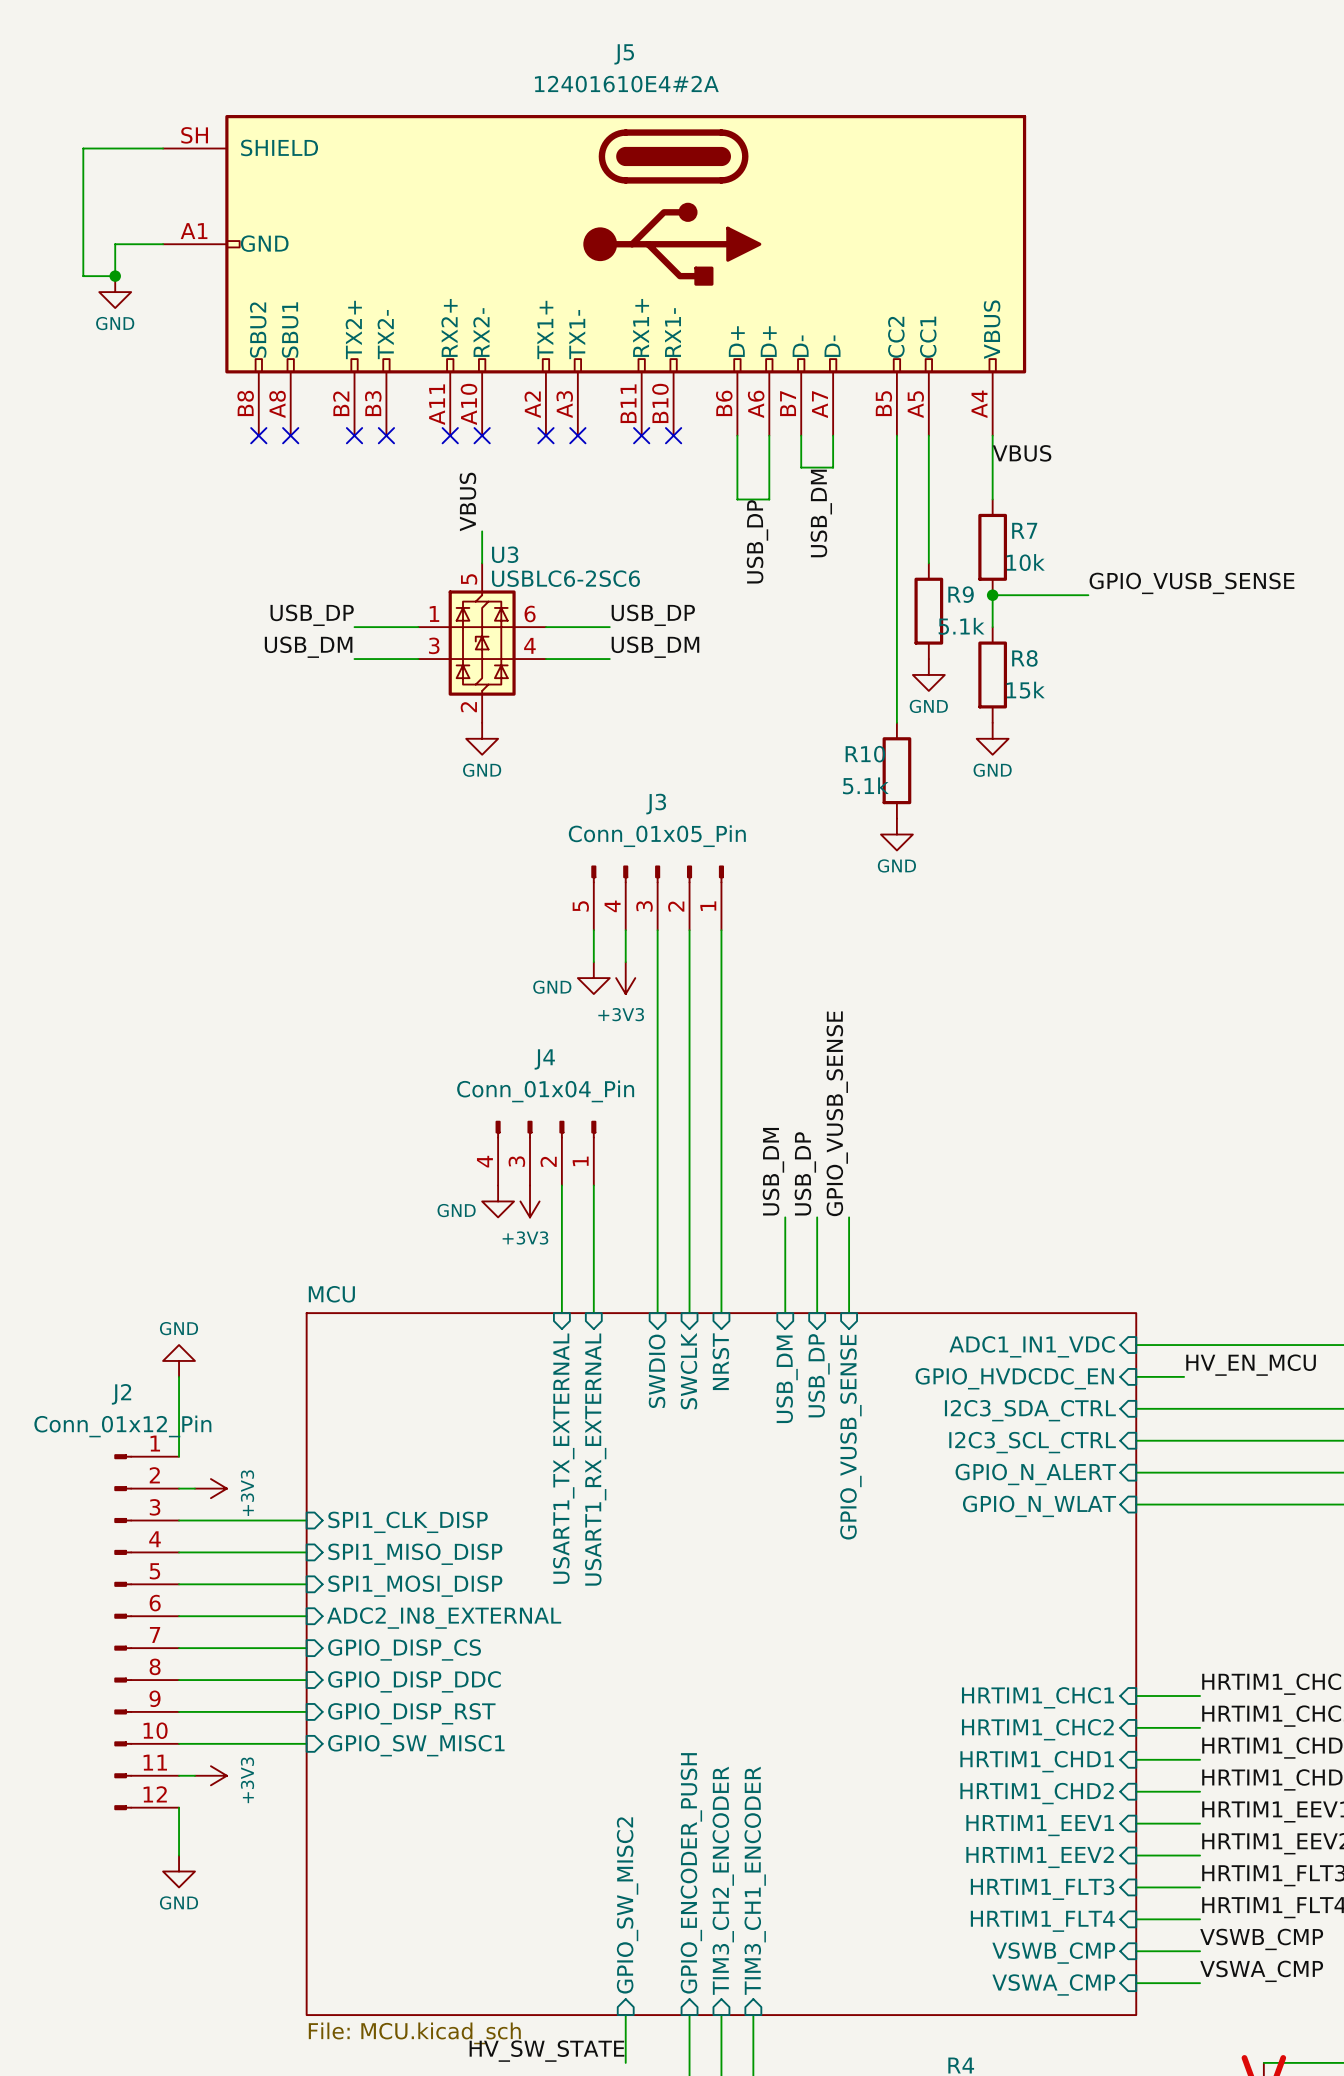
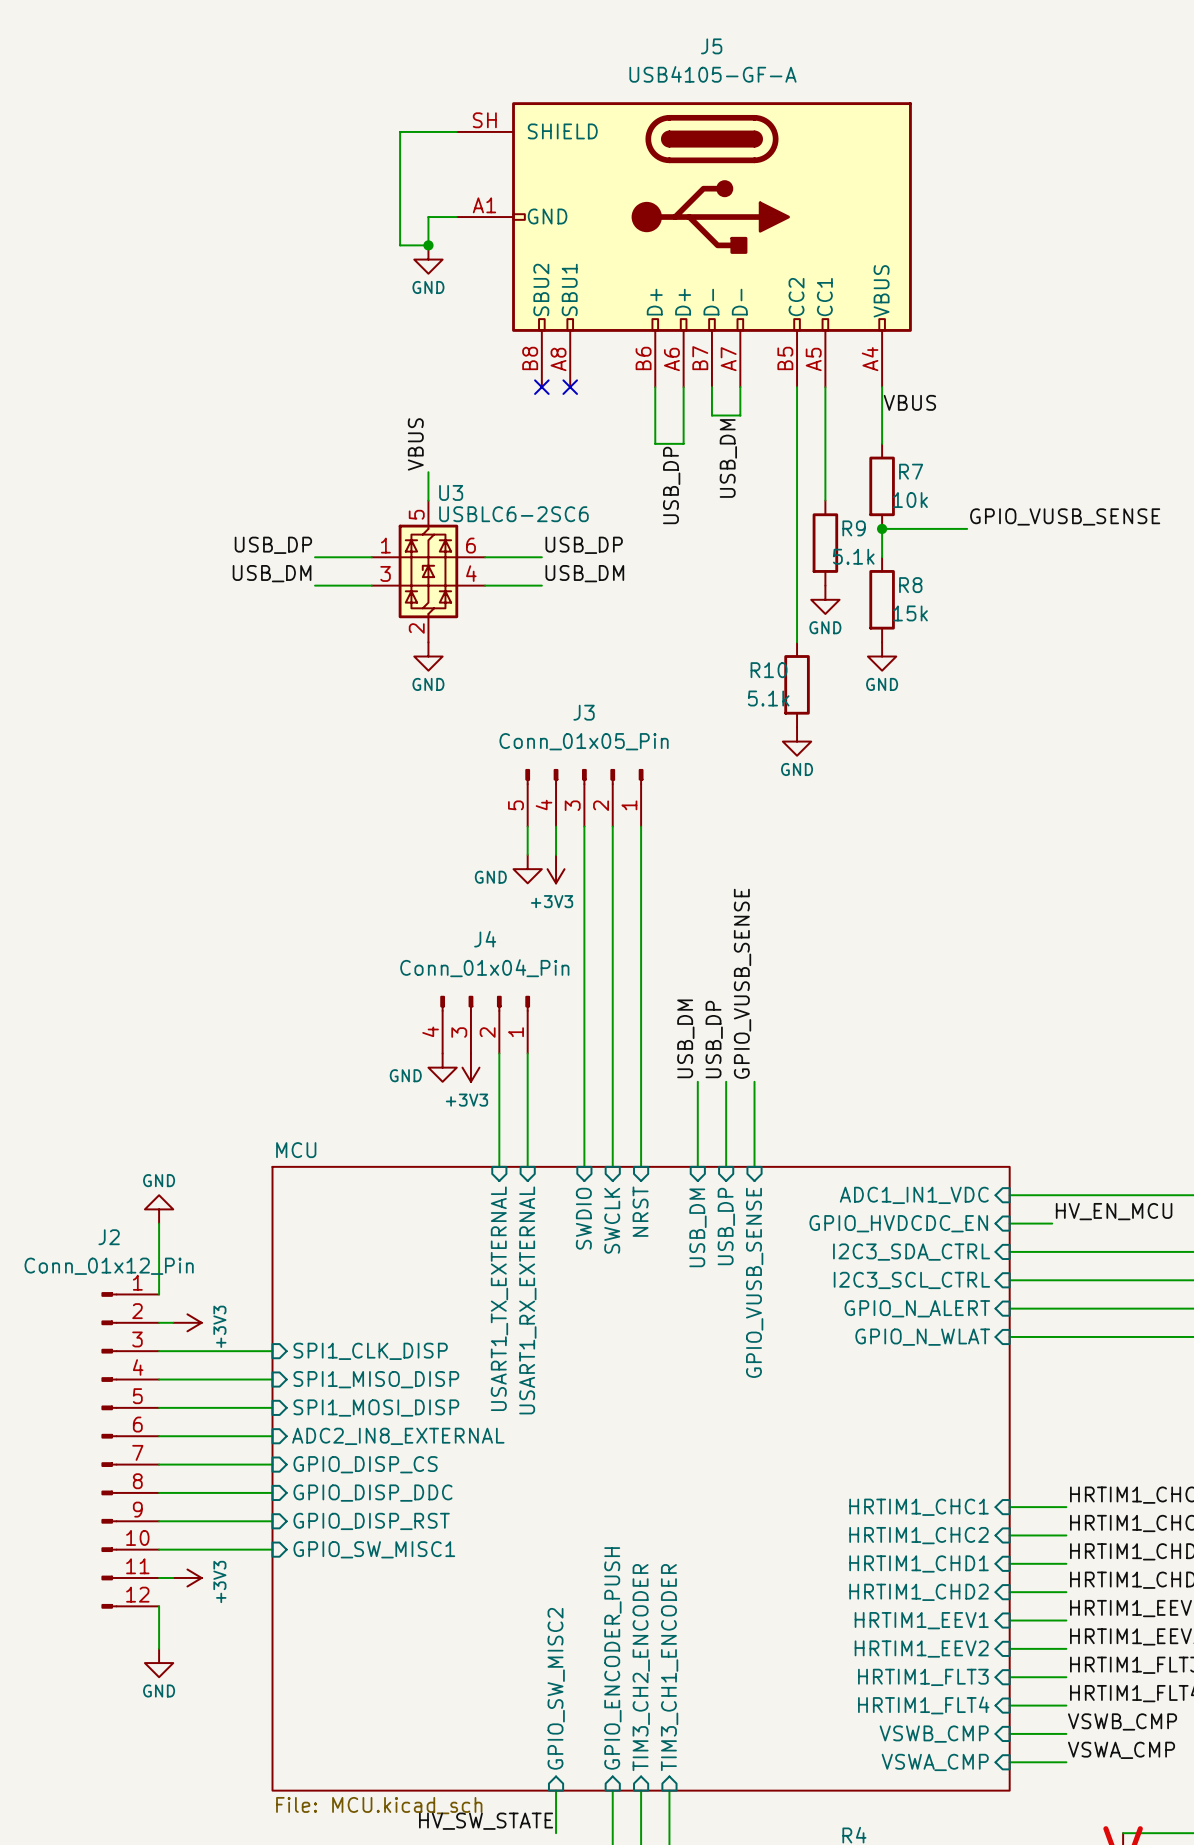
J5 value: 12401610E4#2A (626, 84) -> USB4105-GF-A (712, 74)
J5 symbol: [163, 115, 1027, 436] -> [456, 102, 912, 388]
wire: (163, 148) (83, 148) (83, 276) (115, 276) (115, 244) (163, 244) -> none
junction: (115, 276) -> none
junction: none -> (428, 245)
power symbol: GND (115, 292) -> none
power symbol: none -> GND (428, 259)
no-connect mark: (258, 435) -> none
no-connect mark: (290, 435) -> none
no-connect mark: (354, 435) -> none
no-connect mark: (386, 435) -> none
no-connect mark: (450, 435) -> none
no-connect mark: (482, 435) -> none
no-connect mark: (545, 435) -> none
no-connect mark: (577, 435) -> none
no-connect mark: none -> (541, 387)
no-connect mark: (673, 435) -> none

